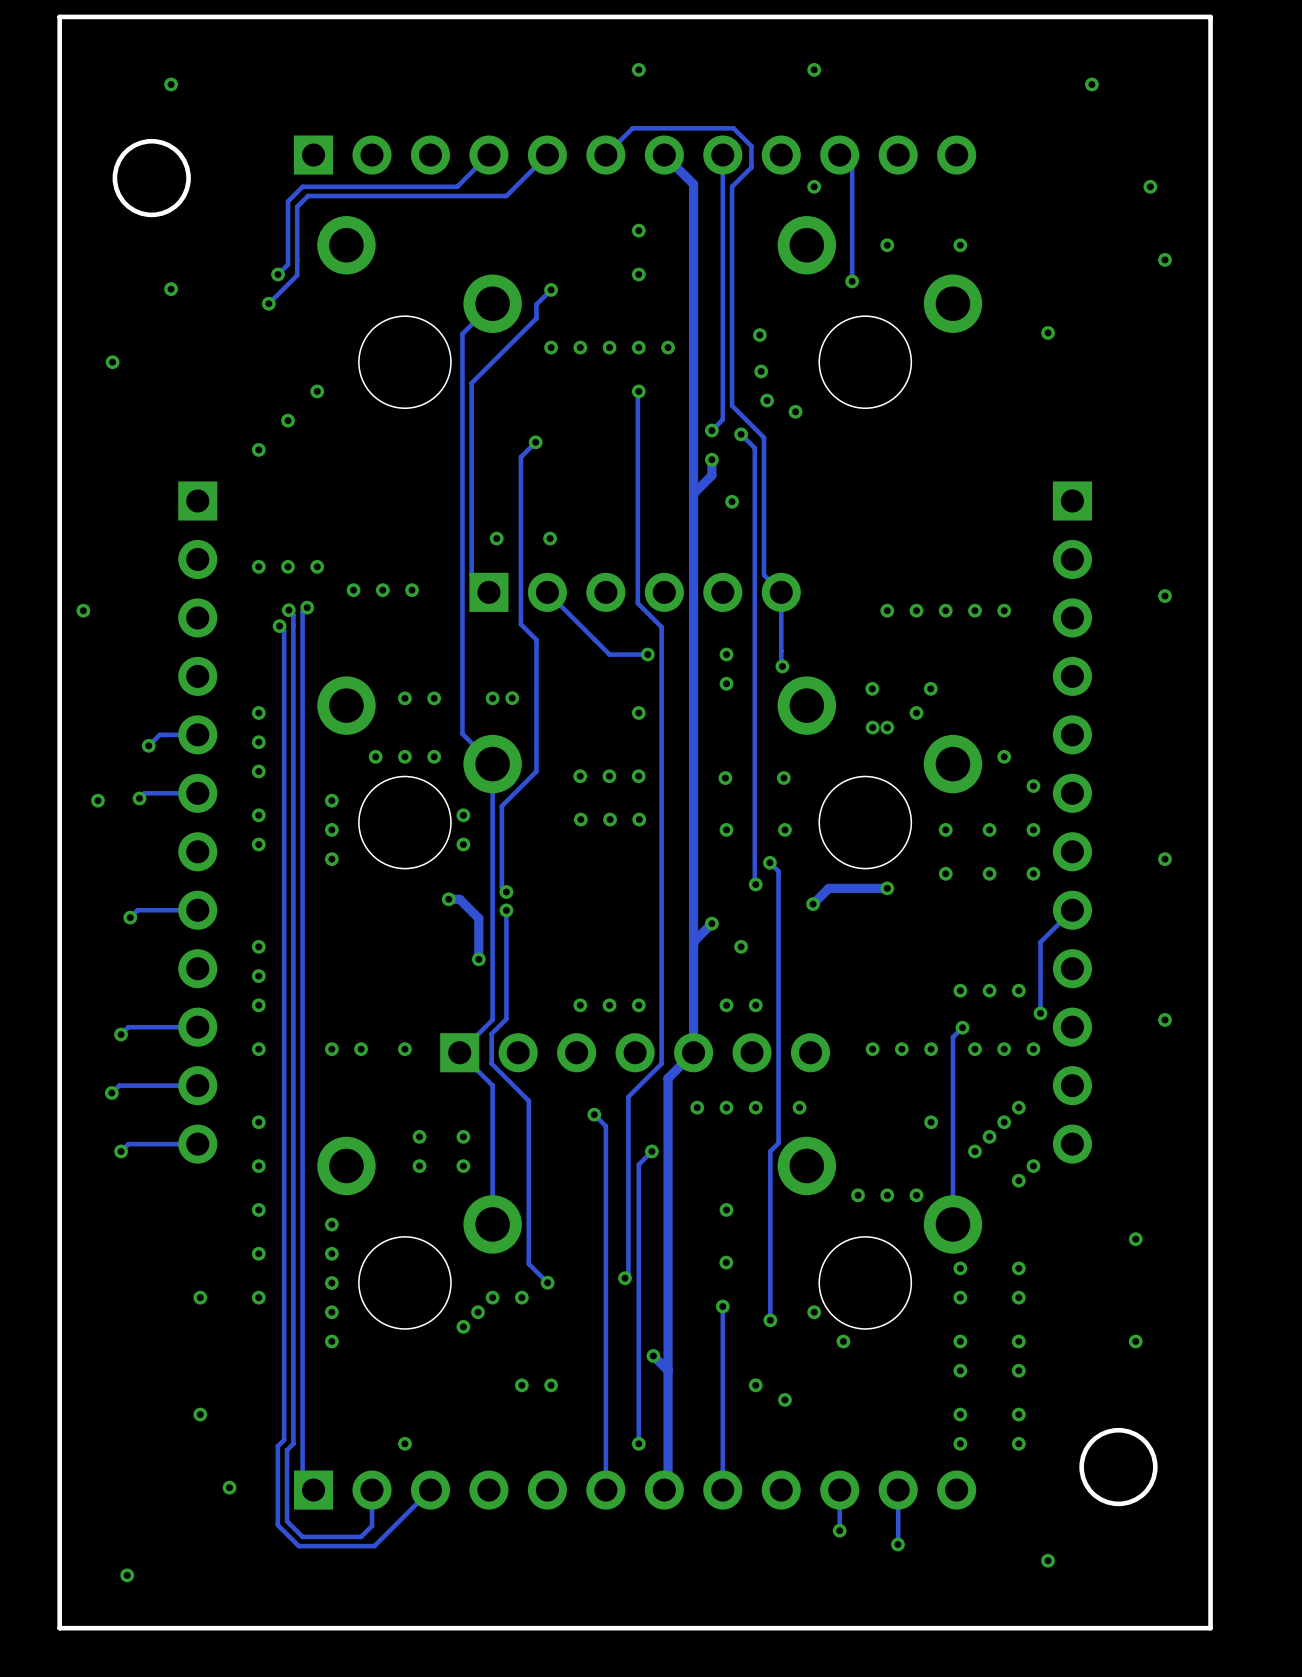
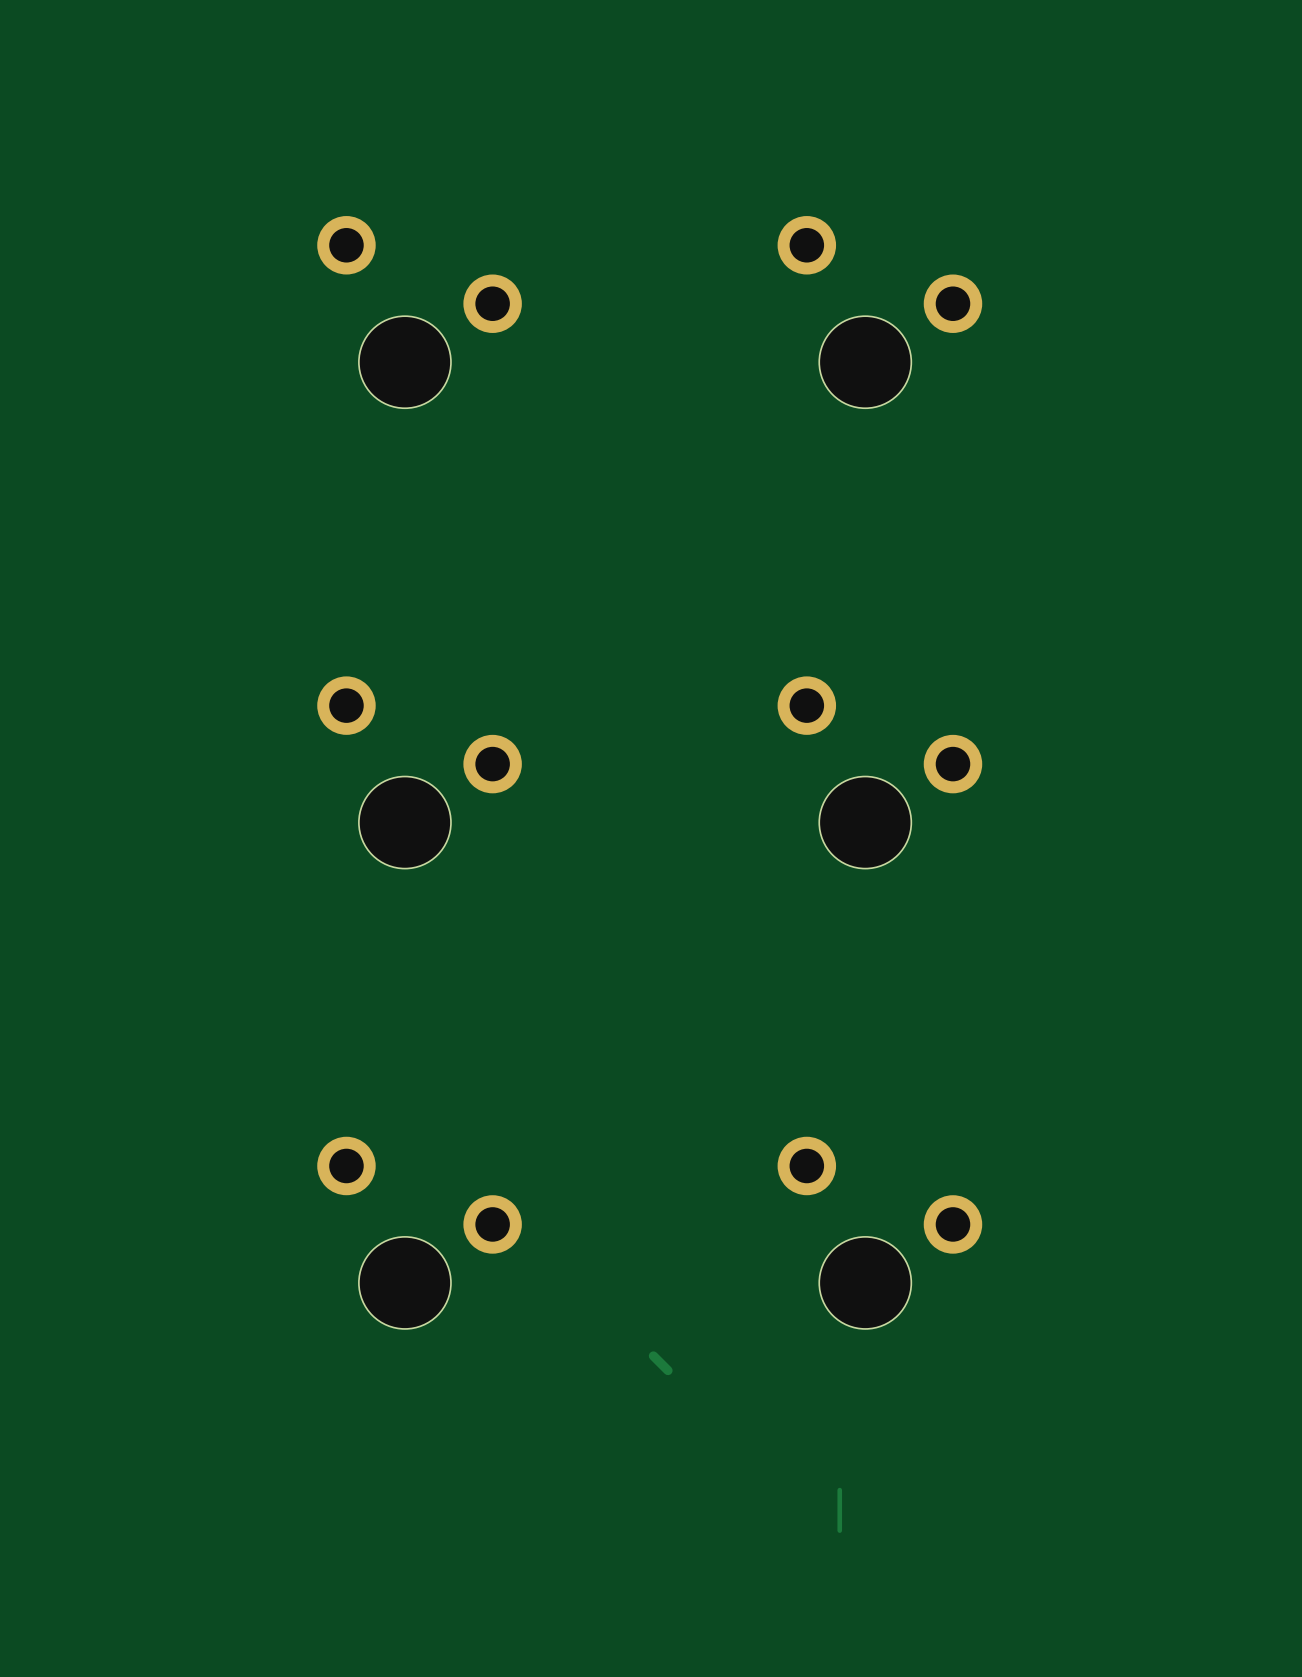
board edge: (1210, 16) (59, 16) (59, 1628) (1210, 1628) (1210, 16) -> none
via: (638, 69) -> none
via: (814, 69) -> none
via: (171, 84) -> none
via: (1091, 84) -> none
round board edge: [112, 138, 191, 218] -> none
track: (488, 155) (457, 186) (302, 186) (288, 201) (288, 264) (278, 274) -> none
track: (547, 155) (506, 196) (308, 196) (297, 206) (297, 275) (268, 303) -> none
track: (605, 155) (632, 128) (733, 128) (751, 146) (751, 167) (732, 186) (732, 405) (764, 437) (764, 575) (781, 592) (782, 666) -> none
part: (635, 155) -> none
track: (664, 155) (693, 184) (693, 1052) (668, 1078) (668, 1486) (664, 1490) -> none
track: (722, 155) (722, 419) (711, 430) -> none
track: (839, 155) (852, 167) (852, 281) -> none
via: (814, 186) -> none
via: (1150, 186) -> none
via: (638, 230) -> none
via: (887, 245) -> none
via: (960, 245) -> none
via: (1164, 259) -> none
via: (278, 274) -> none
via: (638, 274) -> none
via: (852, 281) -> none
via: (171, 289) -> none
track: (551, 289) (536, 304) (536, 318) (471, 383) (471, 575) (488, 592) -> none
via: (551, 289) -> none
via: (268, 303) -> none
track: (492, 303) (462, 333) (462, 733) (492, 764) (492, 1019) (459, 1052) (492, 1085) (492, 1224) -> none
via: (1048, 332) -> none
via: (759, 335) -> none
via: (551, 347) -> none
via: (580, 347) -> none
via: (609, 347) -> none
via: (638, 347) -> none
via: (668, 347) -> none
via: (112, 362) -> none
via: (761, 371) -> none
via: (317, 391) -> none
track: (638, 391) (637, 603) (661, 627) (661, 1063) (628, 1096) (628, 1274) (624, 1278) -> none
via: (638, 391) -> none
via: (767, 400) -> none
via: (795, 411) -> none
via: (288, 420) -> none
via: (711, 430) -> none
track: (741, 434) (754, 448) (755, 884) -> none
via: (741, 434) -> none
track: (535, 442) (520, 457) (520, 624) (536, 639) (536, 771) (501, 806) (501, 887) (506, 892) -> none
via: (535, 442) -> none
via: (258, 449) -> none
track: (711, 459) (711, 475) (693, 493) -> none
via: (711, 459) -> none
via: (732, 501) -> none
via: (496, 538) -> none
via: (550, 538) -> none
via: (258, 566) -> none
via: (288, 566) -> none
via: (317, 566) -> none
via: (353, 590) -> none
via: (382, 590) -> none
via: (412, 590) -> none
track: (547, 592) (609, 654) (647, 654) -> none
part: (635, 592) -> none
via: (1164, 596) -> none
track: (307, 607) (302, 612) (302, 1487) -> none
via: (307, 607) -> none
via: (83, 610) -> none
track: (288, 610) (293, 614) (293, 625) -> none
via: (288, 610) -> none
via: (887, 610) -> none
via: (916, 610) -> none
via: (945, 610) -> none
via: (974, 610) -> none
via: (1004, 610) -> none
track: (293, 625) (293, 1443) (287, 1450) (287, 1521) (302, 1536) (361, 1536) (372, 1525) (372, 1490) -> none
track: (279, 626) (284, 630) (284, 1439) (277, 1446) (277, 1525) (298, 1546) (374, 1546) (430, 1490) -> none
via: (279, 626) -> none
via: (647, 654) -> none
via: (726, 654) -> none
via: (782, 666) -> none
via: (726, 683) -> none
via: (872, 688) -> none
via: (930, 688) -> none
via: (404, 698) -> none
via: (434, 698) -> none
via: (492, 698) -> none
via: (512, 698) -> none
via: (258, 712) -> none
via: (638, 712) -> none
via: (916, 712) -> none
via: (872, 727) -> none
via: (887, 727) -> none
track: (197, 734) (159, 734) (148, 745) -> none
via: (258, 742) -> none
via: (148, 745) -> none
via: (375, 756) -> none
via: (404, 756) -> none
via: (434, 756) -> none
via: (1004, 756) -> none
via: (258, 771) -> none
via: (580, 776) -> none
via: (609, 776) -> none
via: (638, 776) -> none
via: (725, 778) -> none
via: (783, 778) -> none
via: (1033, 786) -> none
track: (197, 793) (144, 793) (139, 798) -> none
via: (139, 798) -> none
via: (97, 800) -> none
via: (331, 800) -> none
via: (258, 815) -> none
via: (463, 815) -> none
via: (580, 819) -> none
via: (610, 819) -> none
via: (639, 819) -> none
part: (197, 822) -> none
part: (1072, 822) -> none
via: (331, 829) -> none
via: (726, 829) -> none
via: (784, 829) -> none
via: (945, 829) -> none
via: (989, 829) -> none
via: (1033, 829) -> none
via: (258, 844) -> none
via: (463, 844) -> none
via: (331, 859) -> none
via: (1164, 859) -> none
track: (769, 862) (778, 871) (778, 1143) (770, 1151) (770, 1320) -> none
via: (769, 862) -> none
via: (945, 873) -> none
via: (989, 873) -> none
via: (1033, 873) -> none
via: (755, 884) -> none
track: (887, 888) (828, 888) (813, 904) -> none
via: (887, 888) -> none
via: (506, 892) -> none
track: (448, 899) (459, 899) (478, 918) (478, 959) -> none
via: (448, 899) -> none
via: (813, 904) -> none
track: (197, 910) (137, 910) (130, 917) -> none
track: (506, 910) (506, 1019) (491, 1033) (491, 1063) (528, 1100) (528, 1263) (547, 1282) -> none
via: (506, 910) -> none
track: (1072, 910) (1040, 942) (1040, 1013) -> none
via: (130, 917) -> none
track: (711, 923) (693, 941) -> none
via: (711, 923) -> none
via: (258, 946) -> none
via: (741, 946) -> none
via: (478, 959) -> none
via: (258, 976) -> none
via: (960, 990) -> none
via: (989, 990) -> none
via: (1018, 990) -> none
via: (258, 1005) -> none
via: (580, 1005) -> none
via: (609, 1005) -> none
via: (638, 1005) -> none
via: (726, 1005) -> none
via: (755, 1005) -> none
via: (1040, 1013) -> none
via: (1164, 1019) -> none
track: (197, 1027) (128, 1027) (121, 1034) -> none
track: (962, 1027) (952, 1037) (952, 1224) -> none
via: (962, 1027) -> none
via: (121, 1034) -> none
via: (258, 1049) -> none
via: (331, 1049) -> none
via: (361, 1049) -> none
via: (404, 1049) -> none
via: (872, 1049) -> none
via: (901, 1049) -> none
via: (931, 1049) -> none
via: (974, 1049) -> none
via: (1004, 1049) -> none
via: (1033, 1049) -> none
part: (635, 1052) -> none
track: (197, 1085) (119, 1085) (111, 1093) -> none
via: (111, 1093) -> none
via: (697, 1107) -> none
via: (726, 1107) -> none
via: (755, 1107) -> none
via: (799, 1107) -> none
via: (1018, 1107) -> none
track: (594, 1114) (605, 1126) (605, 1490) -> none
via: (594, 1114) -> none
via: (258, 1122) -> none
via: (931, 1122) -> none
via: (1004, 1122) -> none
via: (419, 1136) -> none
via: (463, 1136) -> none
via: (989, 1136) -> none
track: (197, 1144) (128, 1144) (121, 1151) -> none
via: (121, 1151) -> none
track: (651, 1151) (638, 1164) (638, 1443) -> none
via: (651, 1151) -> none
via: (974, 1151) -> none
via: (258, 1166) -> none
via: (419, 1166) -> none
via: (463, 1166) -> none
via: (1033, 1166) -> none
via: (1018, 1180) -> none
via: (858, 1195) -> none
via: (887, 1195) -> none
via: (916, 1195) -> none
via: (258, 1209) -> none
via: (726, 1209) -> none
via: (331, 1224) -> none
via: (1135, 1239) -> none
via: (258, 1253) -> none
via: (331, 1253) -> none
via: (726, 1262) -> none
via: (960, 1268) -> none
via: (1018, 1268) -> none
via: (624, 1278) -> none
via: (547, 1282) -> none
via: (331, 1283) -> none
via: (200, 1297) -> none
via: (258, 1297) -> none
via: (492, 1297) -> none
via: (521, 1297) -> none
via: (960, 1297) -> none
via: (1018, 1297) -> none
track: (722, 1306) (722, 1490) -> none
via: (722, 1306) -> none
via: (331, 1312) -> none
via: (478, 1312) -> none
via: (814, 1312) -> none
via: (770, 1320) -> none
via: (463, 1326) -> none
via: (331, 1341) -> none
via: (843, 1341) -> none
via: (960, 1341) -> none
via: (1018, 1341) -> none
via: (1135, 1341) -> none
via: (653, 1355) -> none
via: (960, 1370) -> none
via: (1018, 1370) -> none
via: (521, 1385) -> none
via: (551, 1385) -> none
via: (755, 1385) -> none
via: (784, 1399) -> none
via: (200, 1414) -> none
via: (960, 1414) -> none
via: (1018, 1414) -> none
round board edge: [1079, 1427, 1158, 1507] -> none
via: (404, 1443) -> none
via: (638, 1443) -> none
via: (960, 1443) -> none
via: (1018, 1443) -> none
via: (229, 1487) -> none
part: (635, 1490) -> none
track: (898, 1490) (898, 1544) -> none
via: (839, 1530) -> none
via: (897, 1544) -> none
via: (1048, 1560) -> none
via: (127, 1575) -> none

